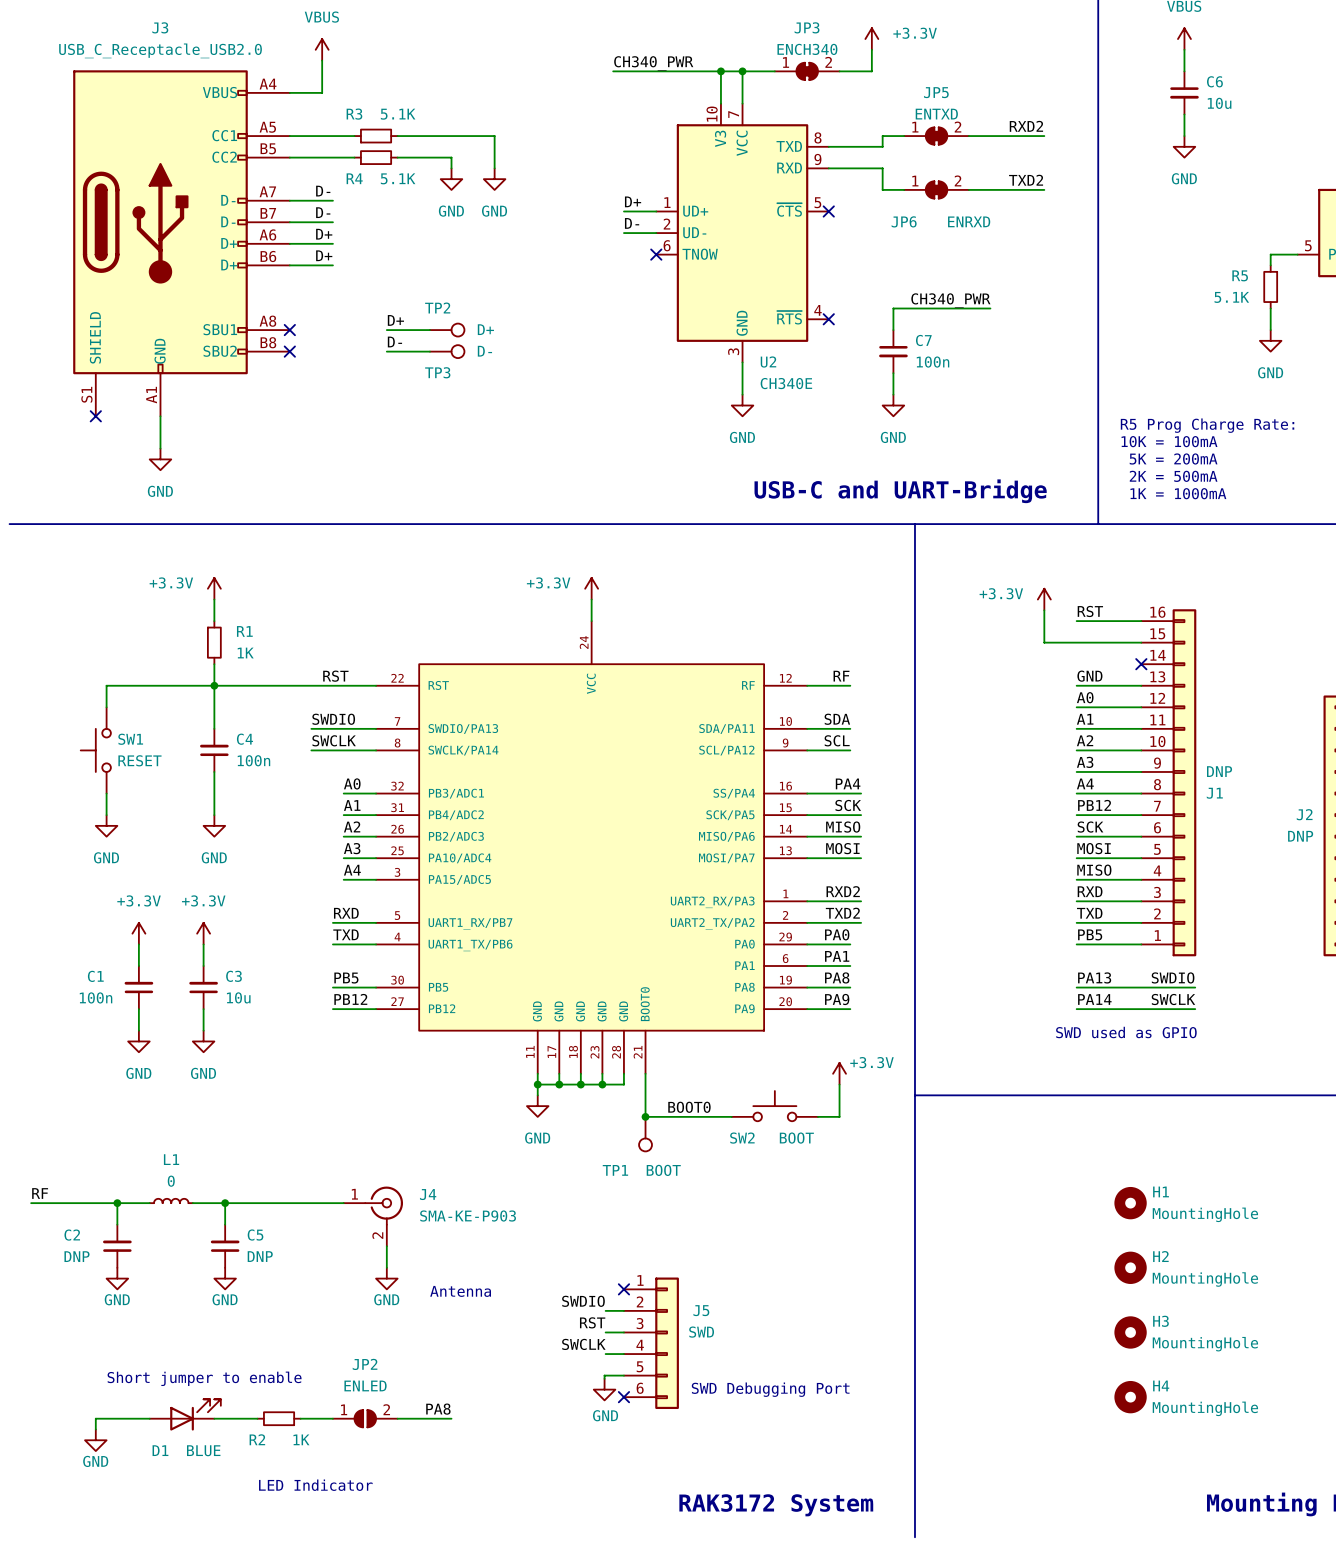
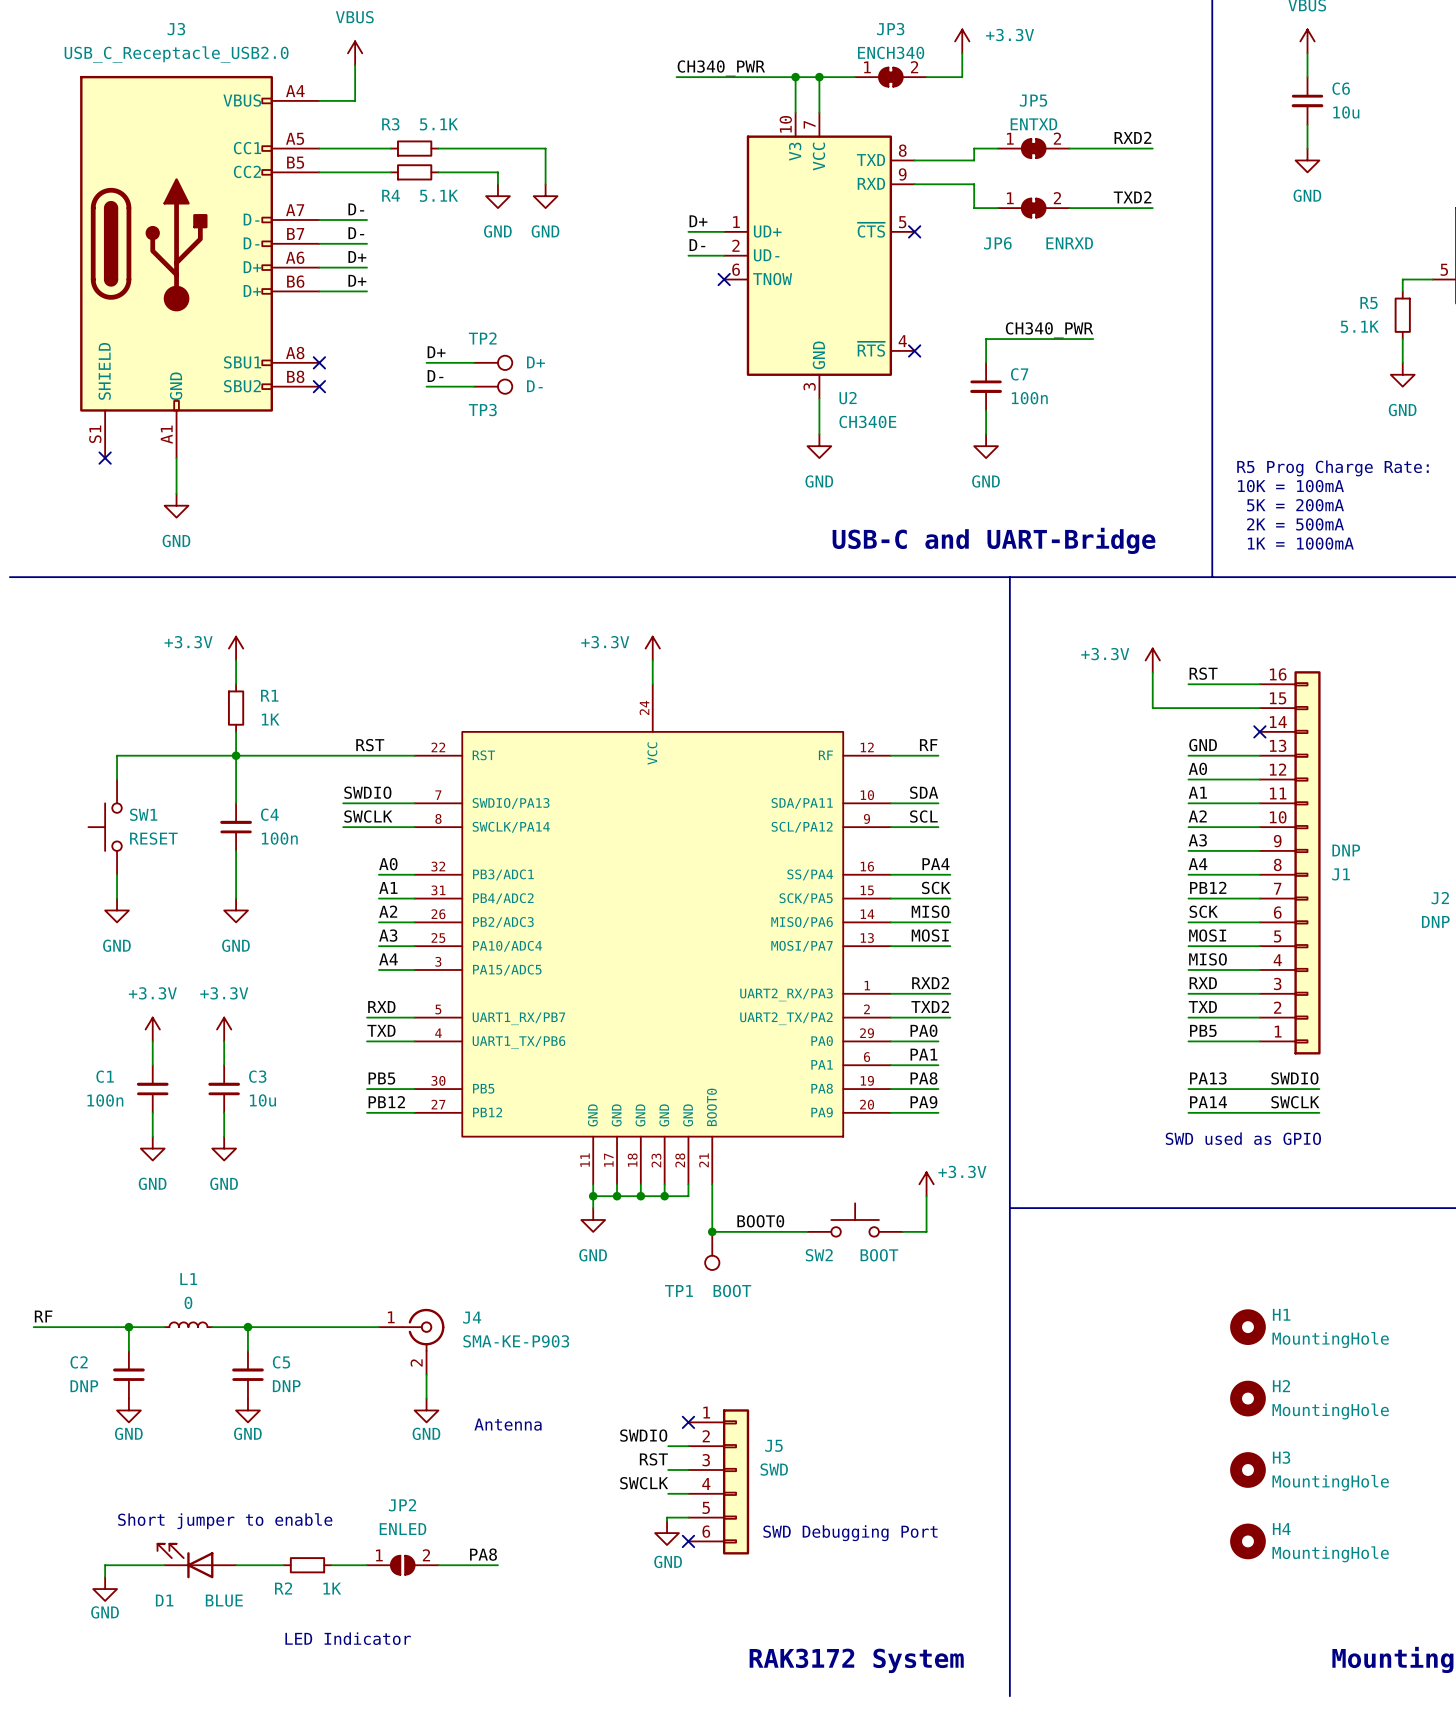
D1 flip: as is (195, 1414) -> left-right (185, 1561)

